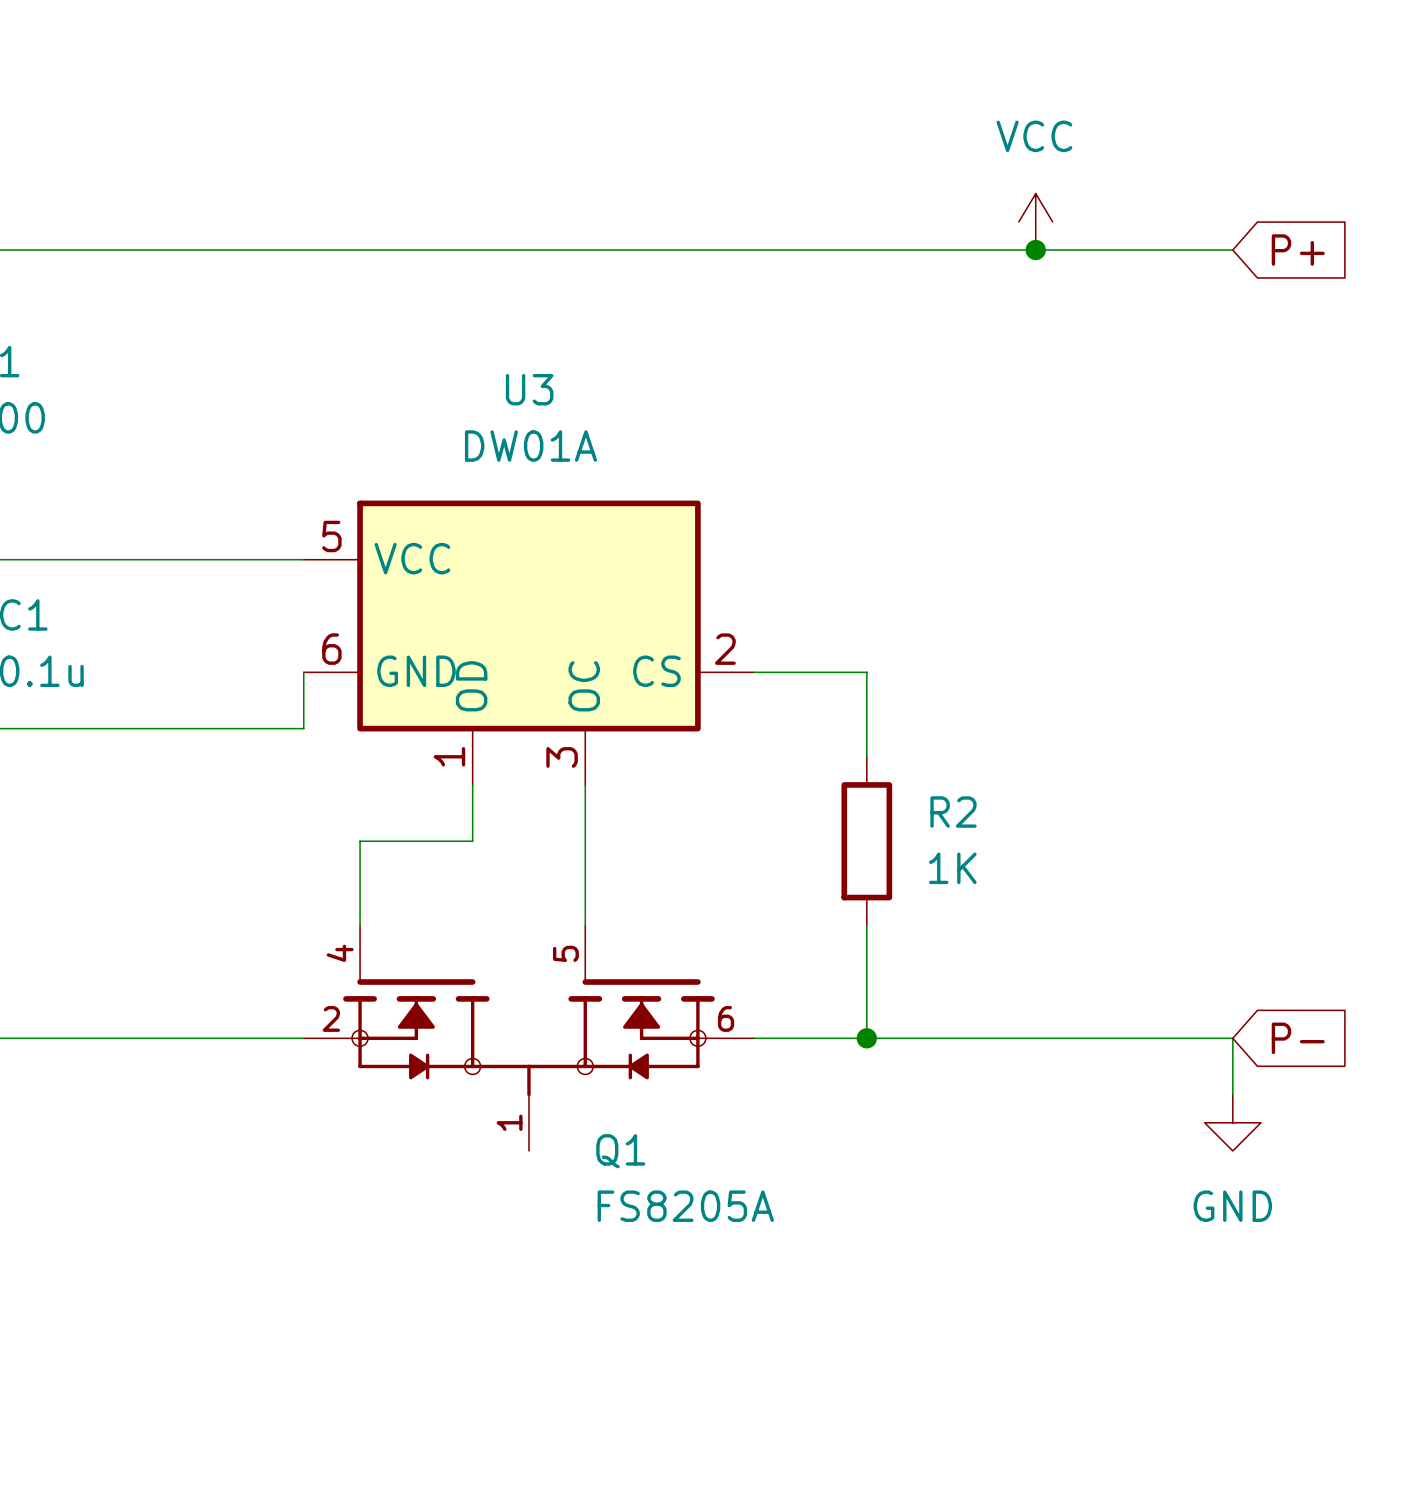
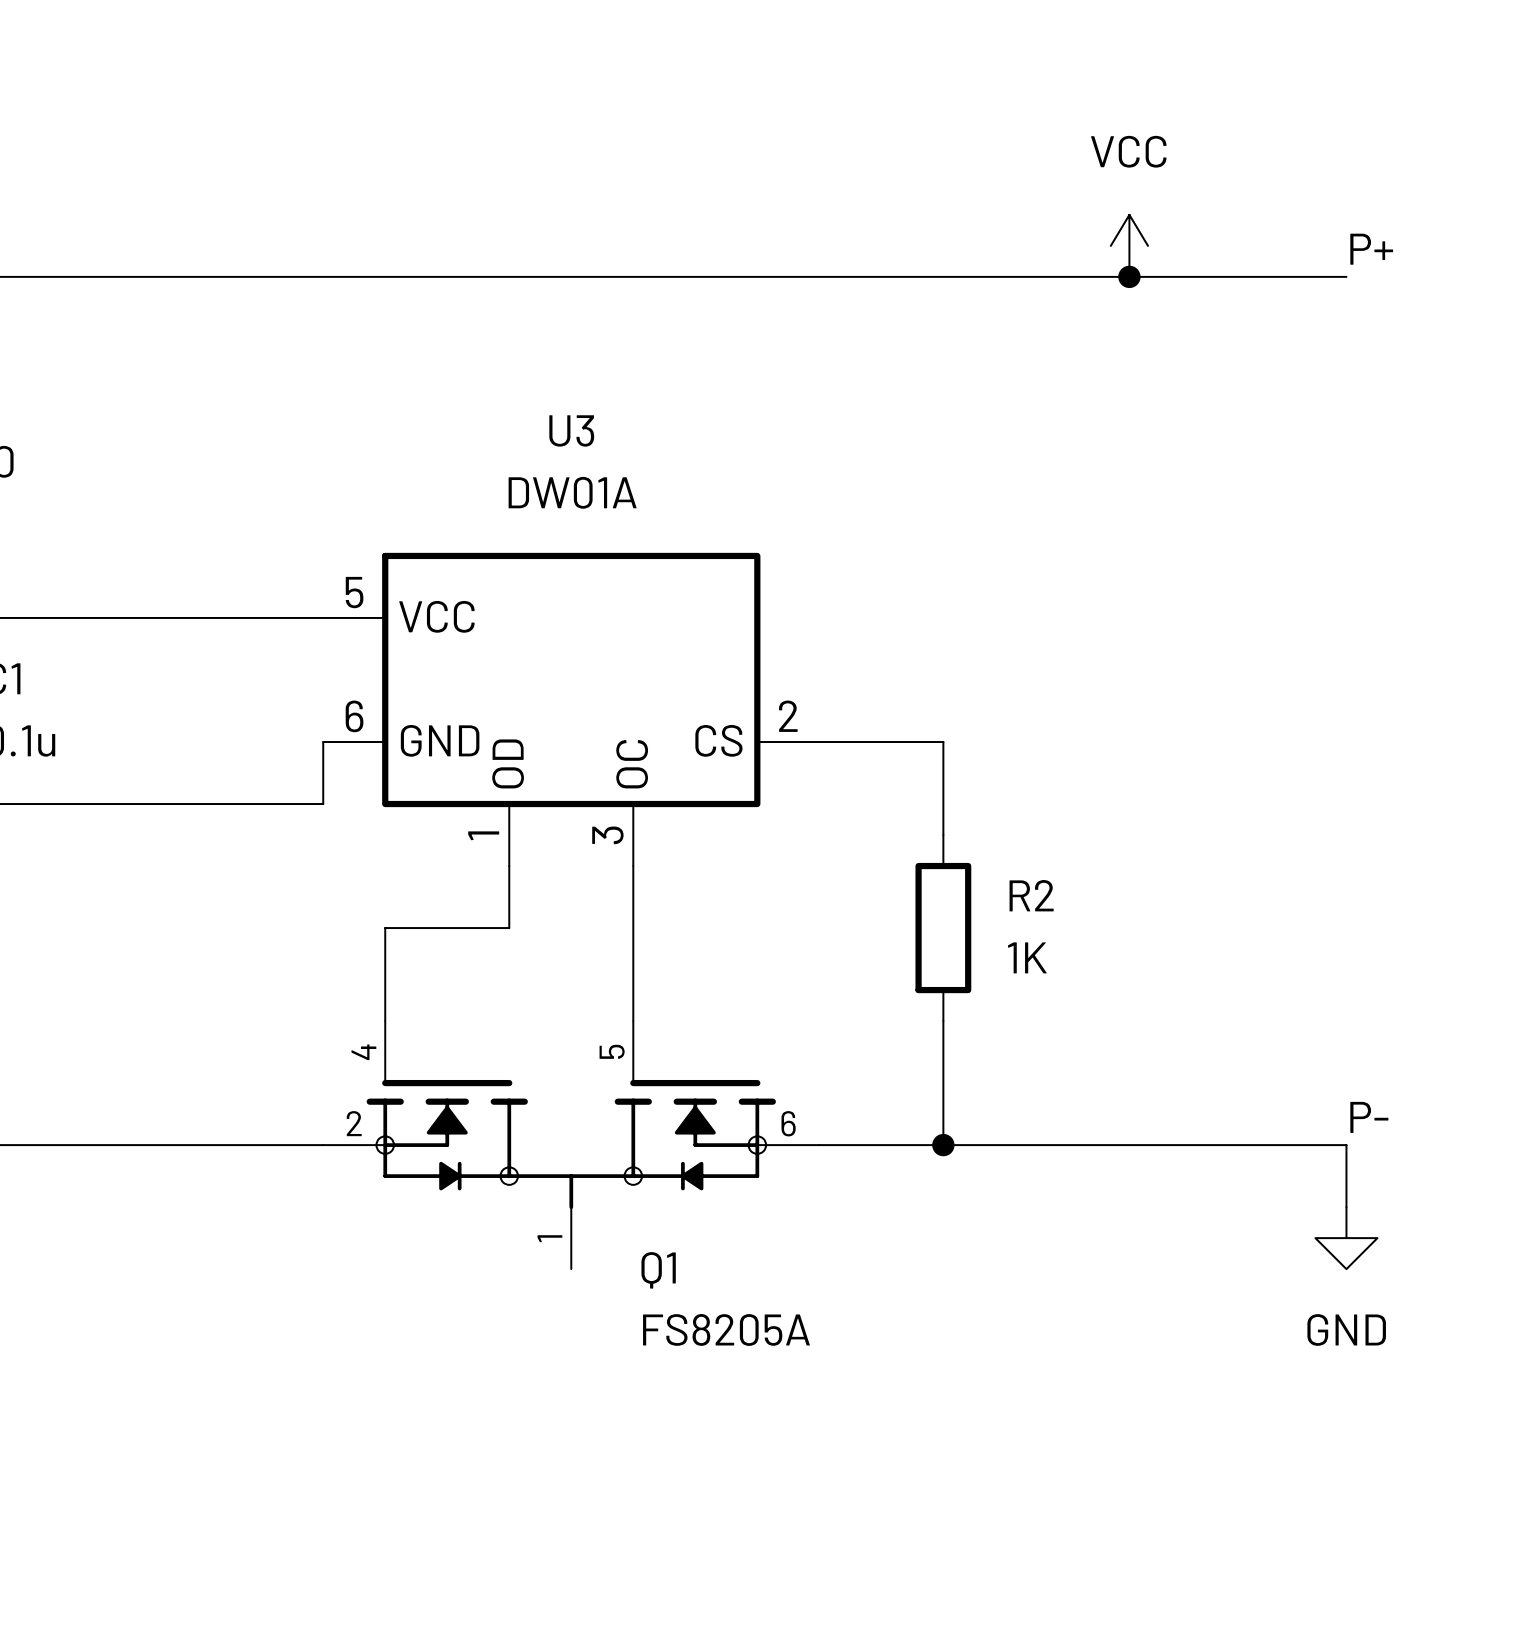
label: none -> P+ (1371, 249)
global label: P+ (1298, 250) -> none
label: none -> P- (1369, 1117)
global label: P- (1298, 1038) -> none

